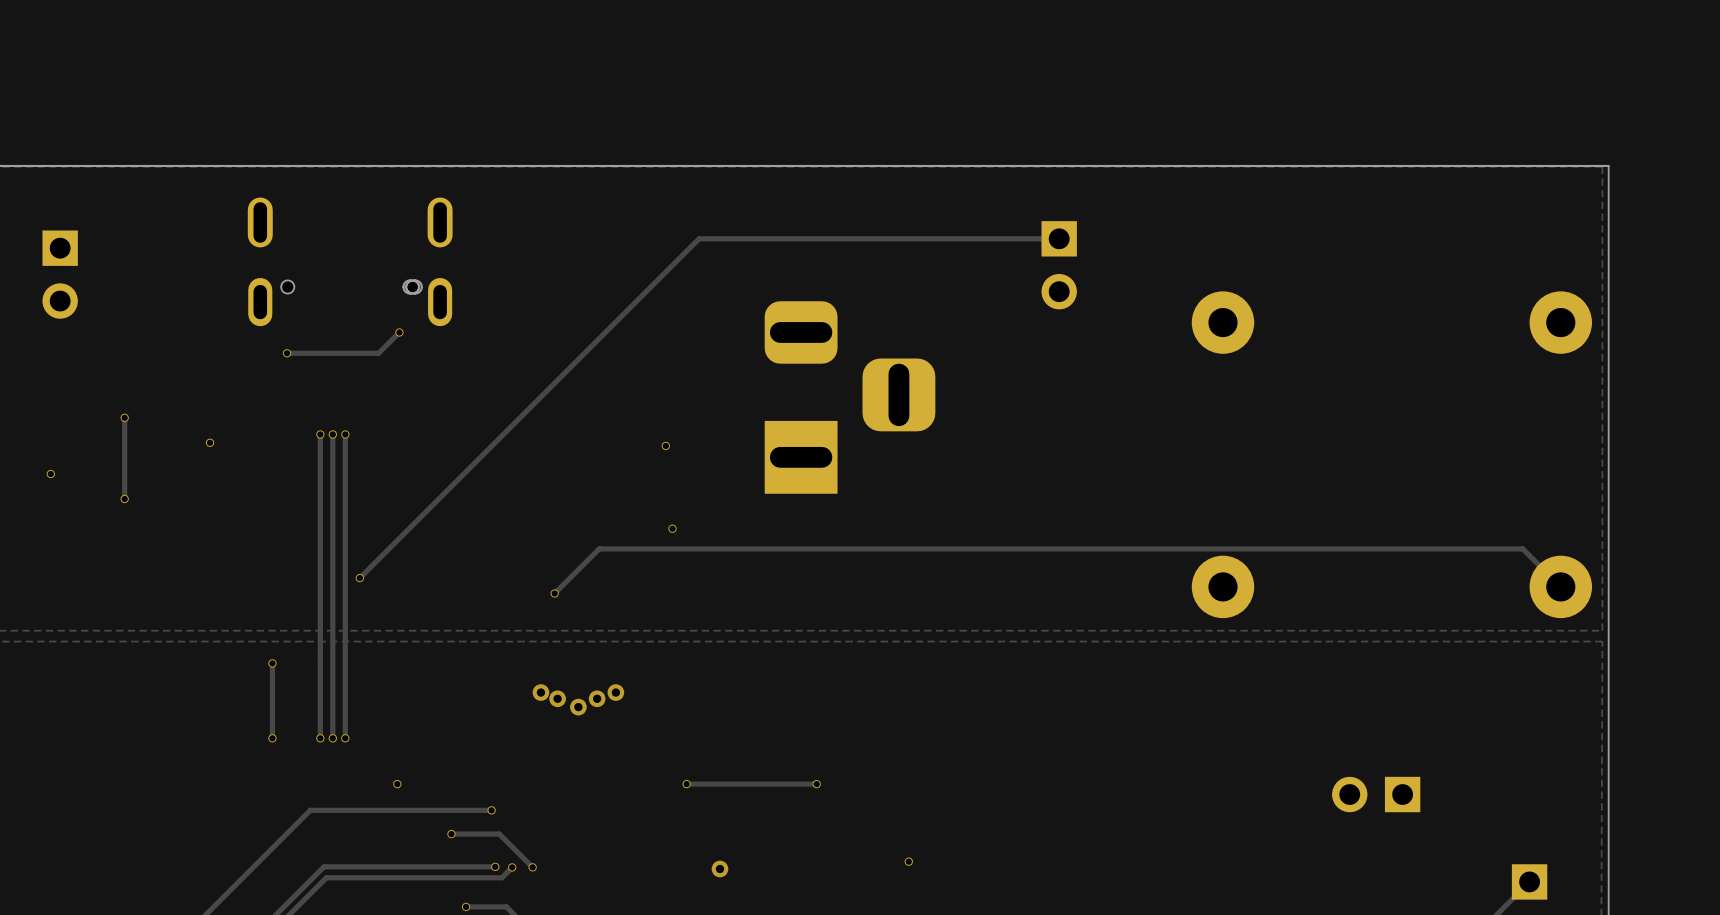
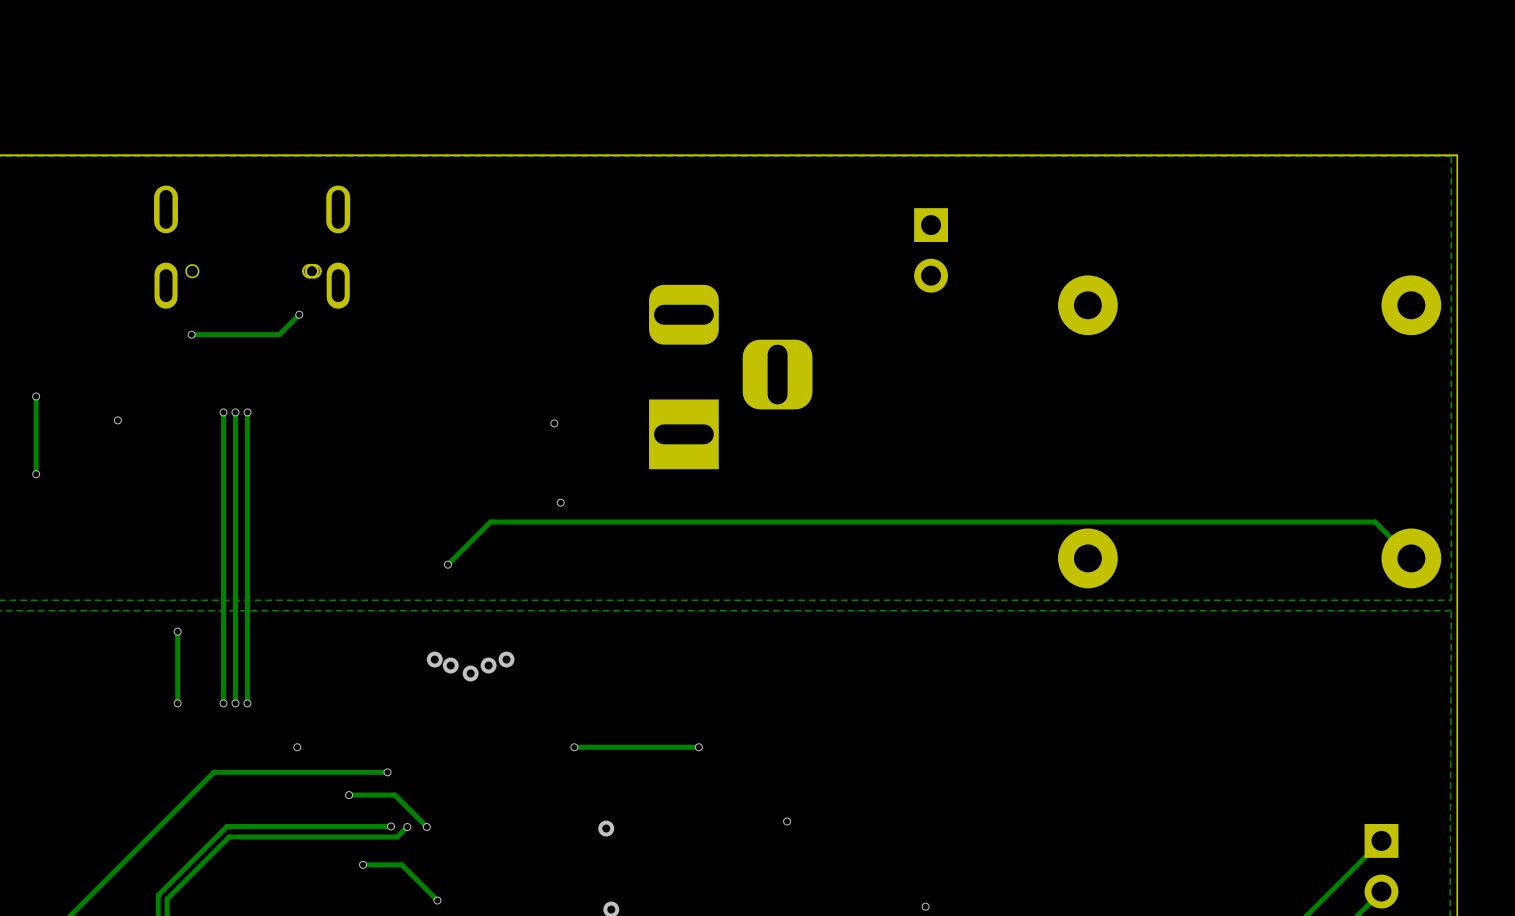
track: (1059, 238) (699, 238) (359, 578) -> none
via: (359, 578) -> none
part: (1376, 794) -> none

